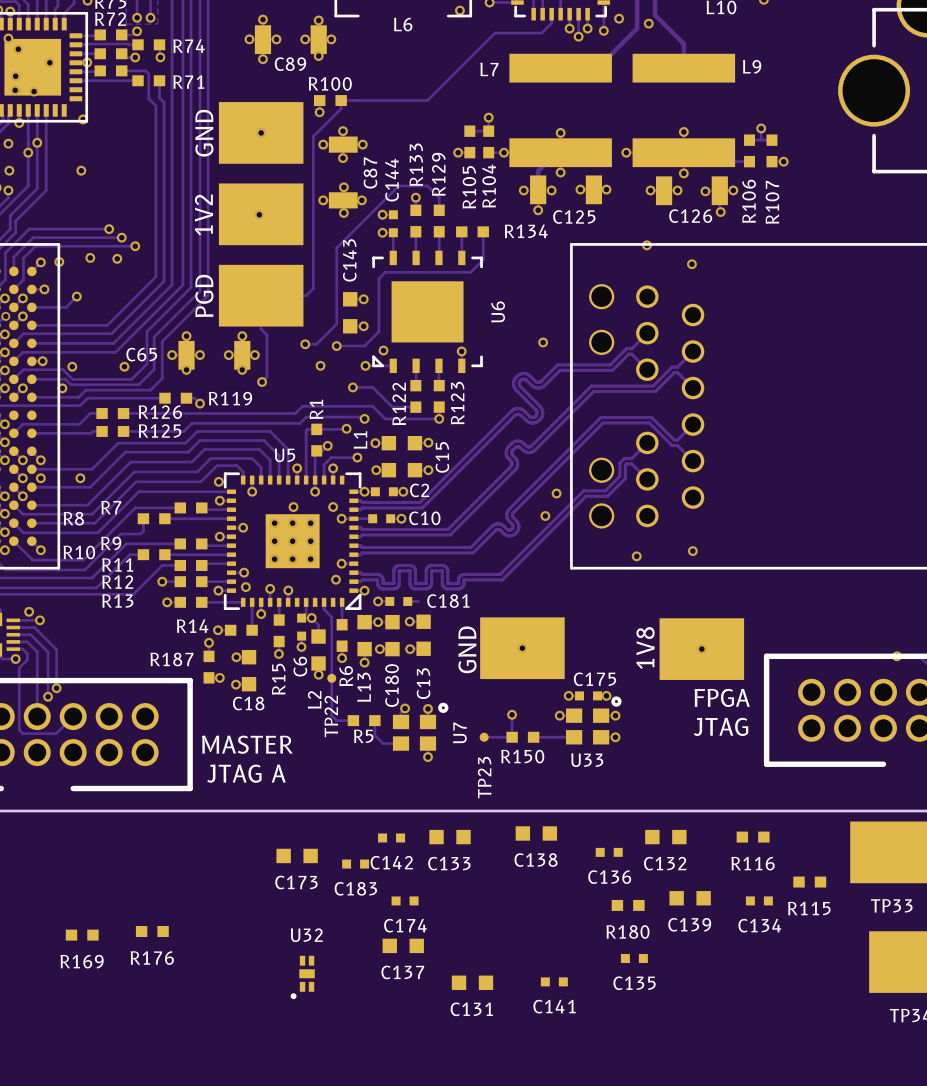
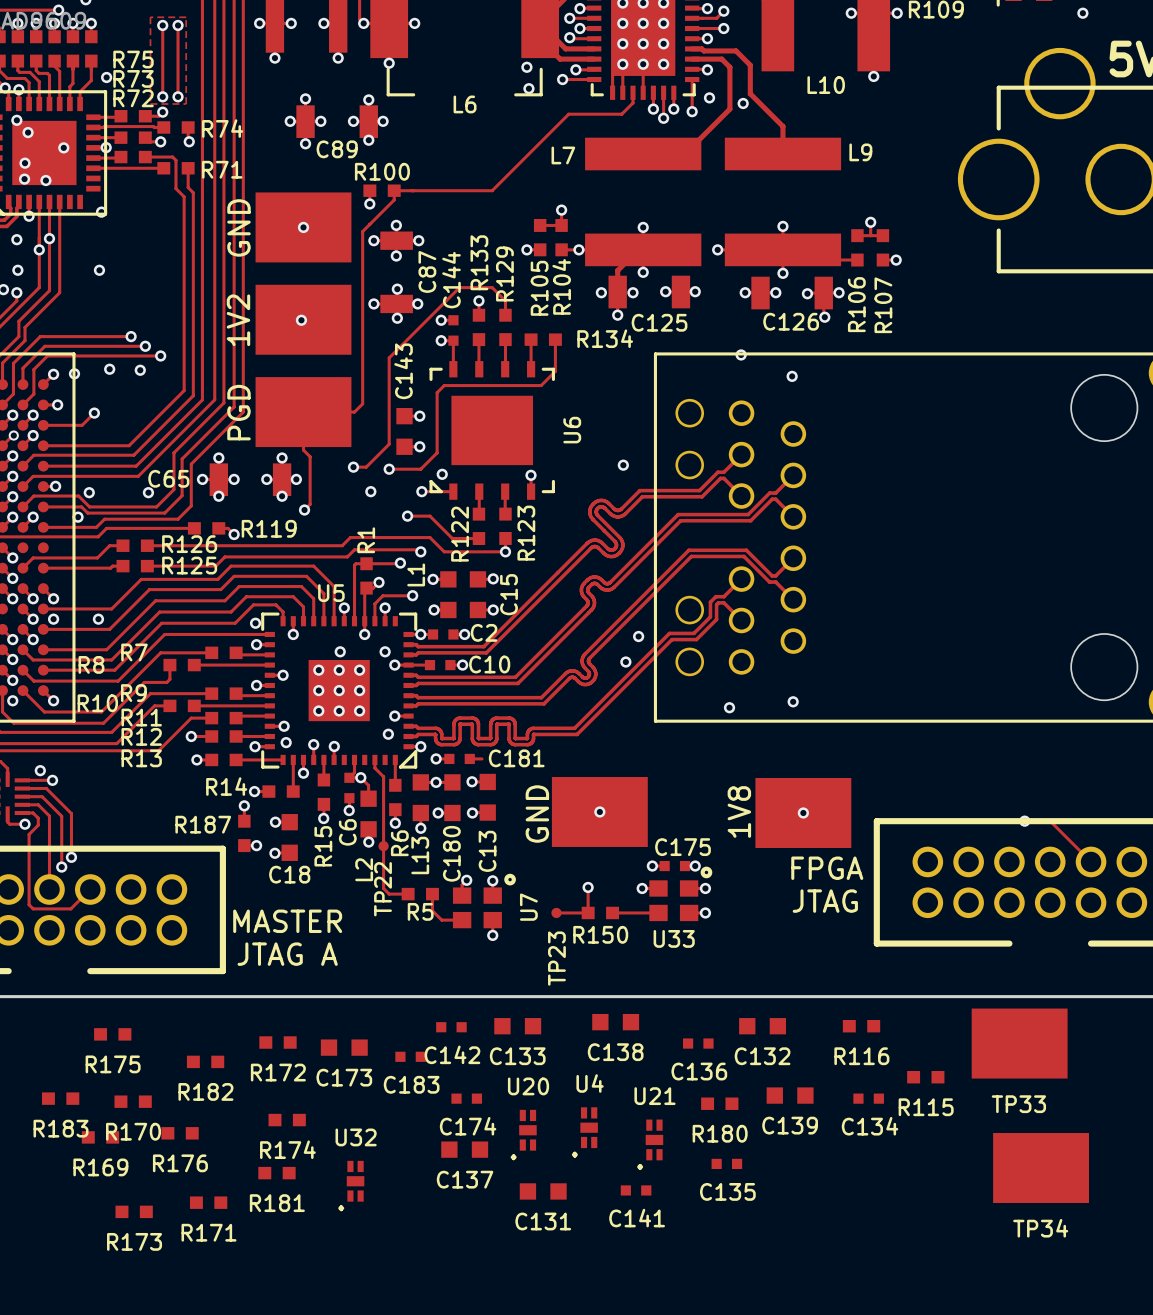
R175: none -> (112, 1034)
R172: none -> (278, 1042)
R182: none -> (205, 1061)
R183: none -> (60, 1098)
R170: none -> (133, 1101)
R174: none -> (287, 1120)
U4: none -> (589, 1127)
U20: none -> (527, 1130)
U21: none -> (654, 1139)
R181: none -> (276, 1173)
R171: none -> (208, 1202)
R173: none -> (134, 1211)

